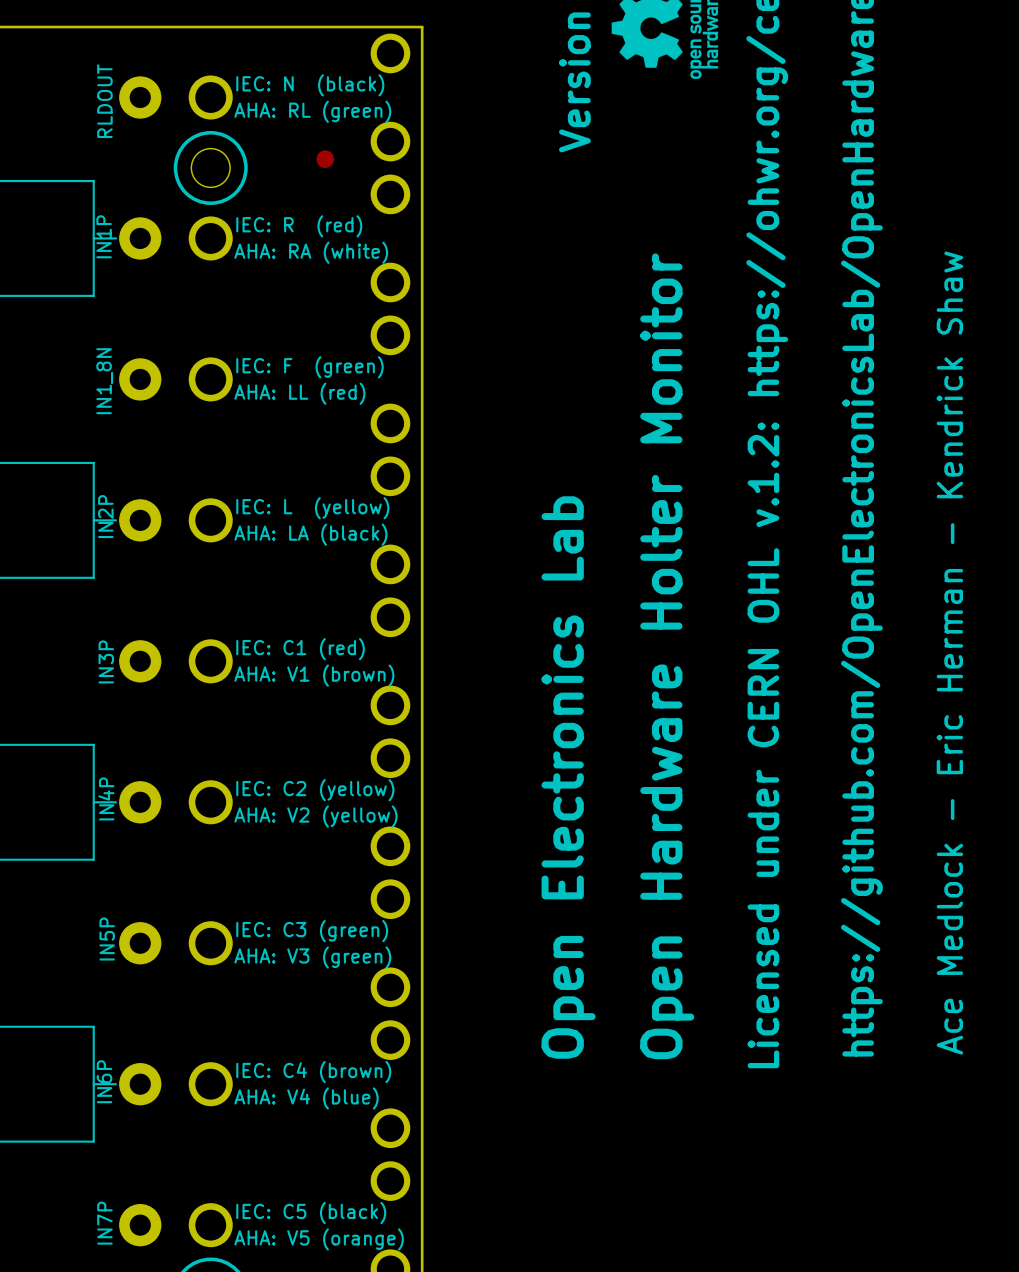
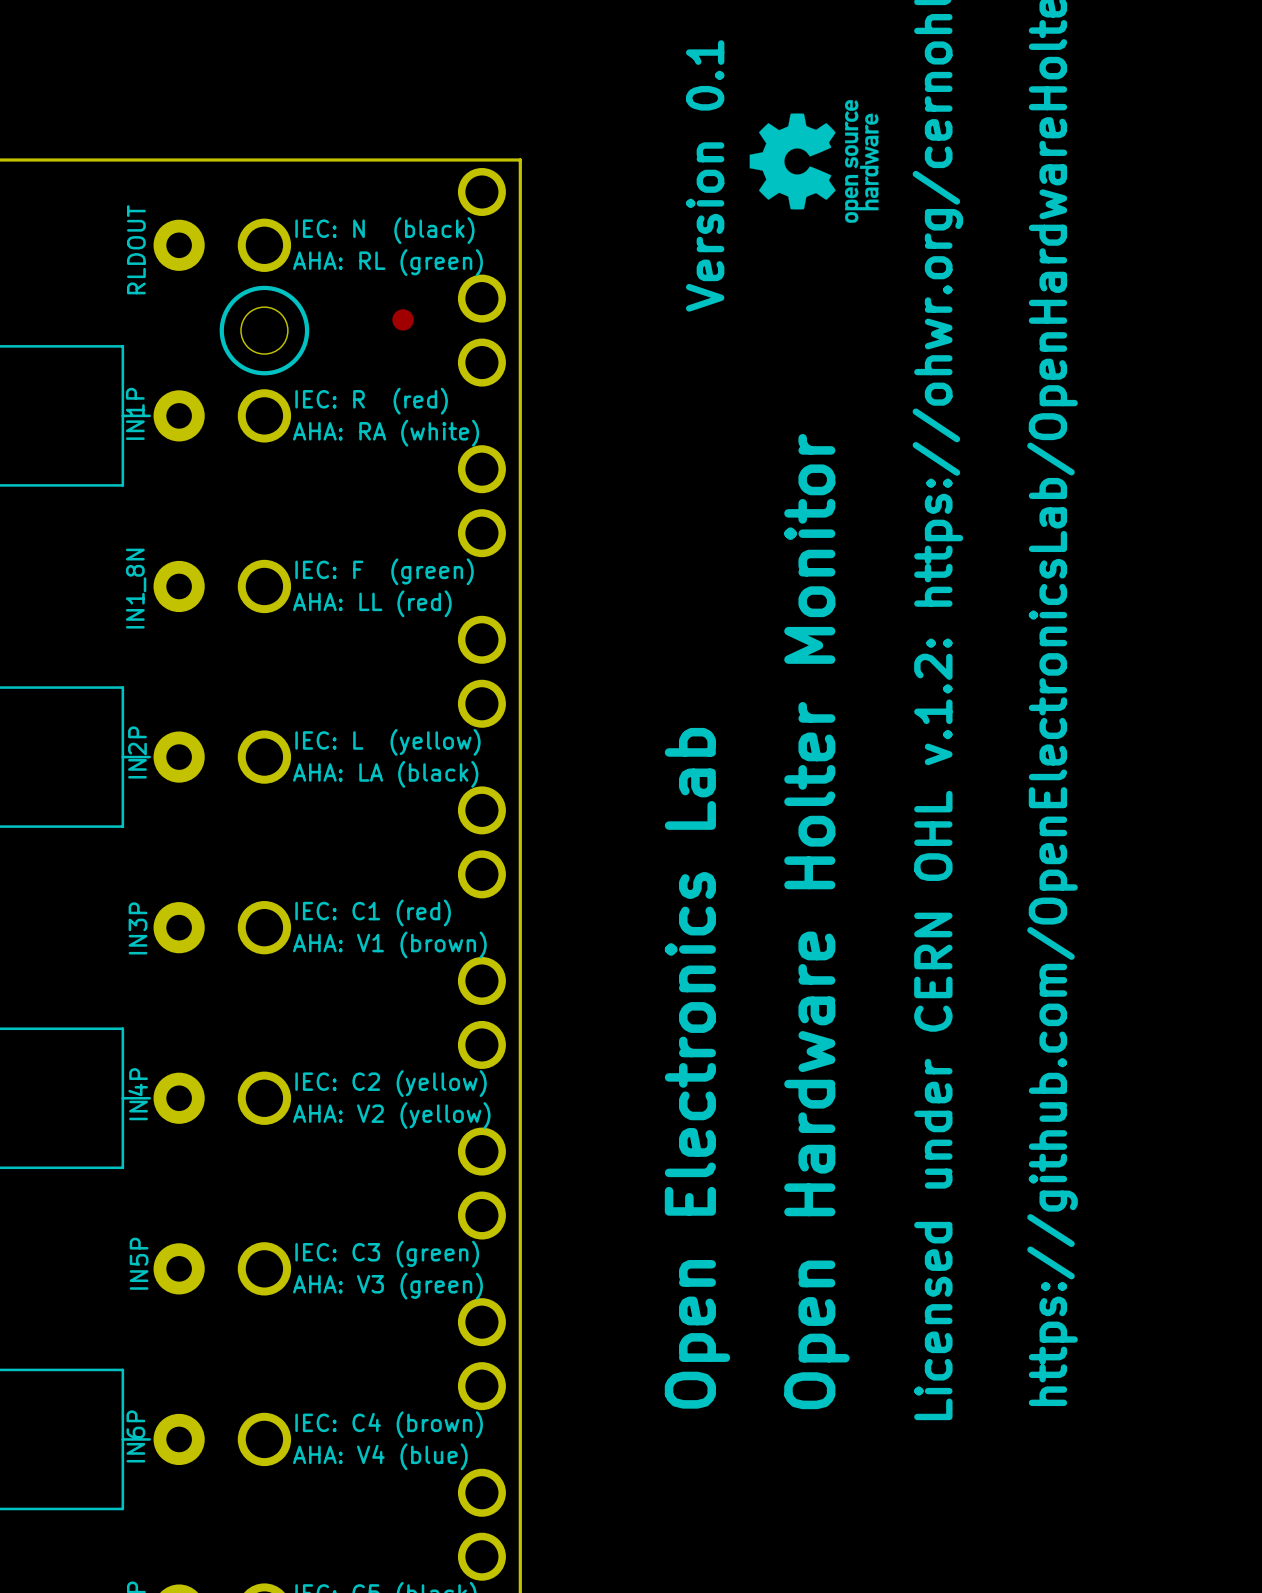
text: Ace Medlock - Eric Herman - Kendrick Shaw (949, 653) -> none

